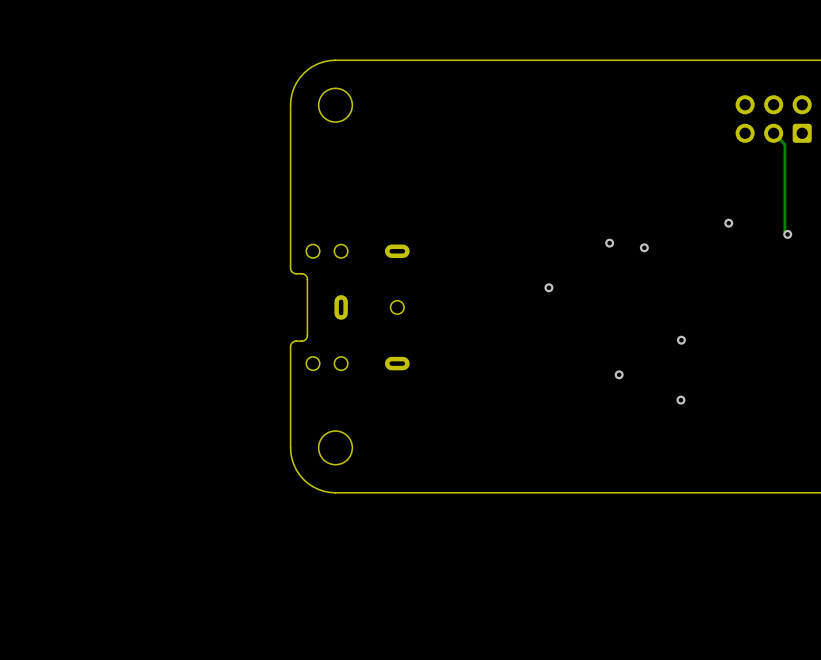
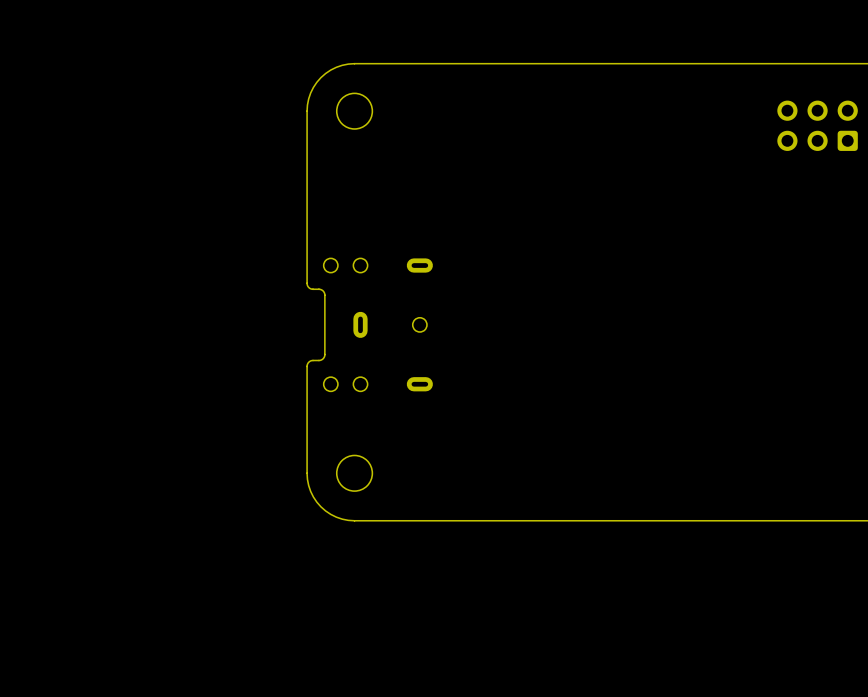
track: (773, 133) (784, 144) (784, 231) (787, 234) -> none
via: (728, 223) -> none
via: (787, 234) -> none
via: (609, 243) -> none
via: (644, 247) -> none
via: (548, 287) -> none
via: (681, 340) -> none
via: (619, 374) -> none
via: (680, 400) -> none

